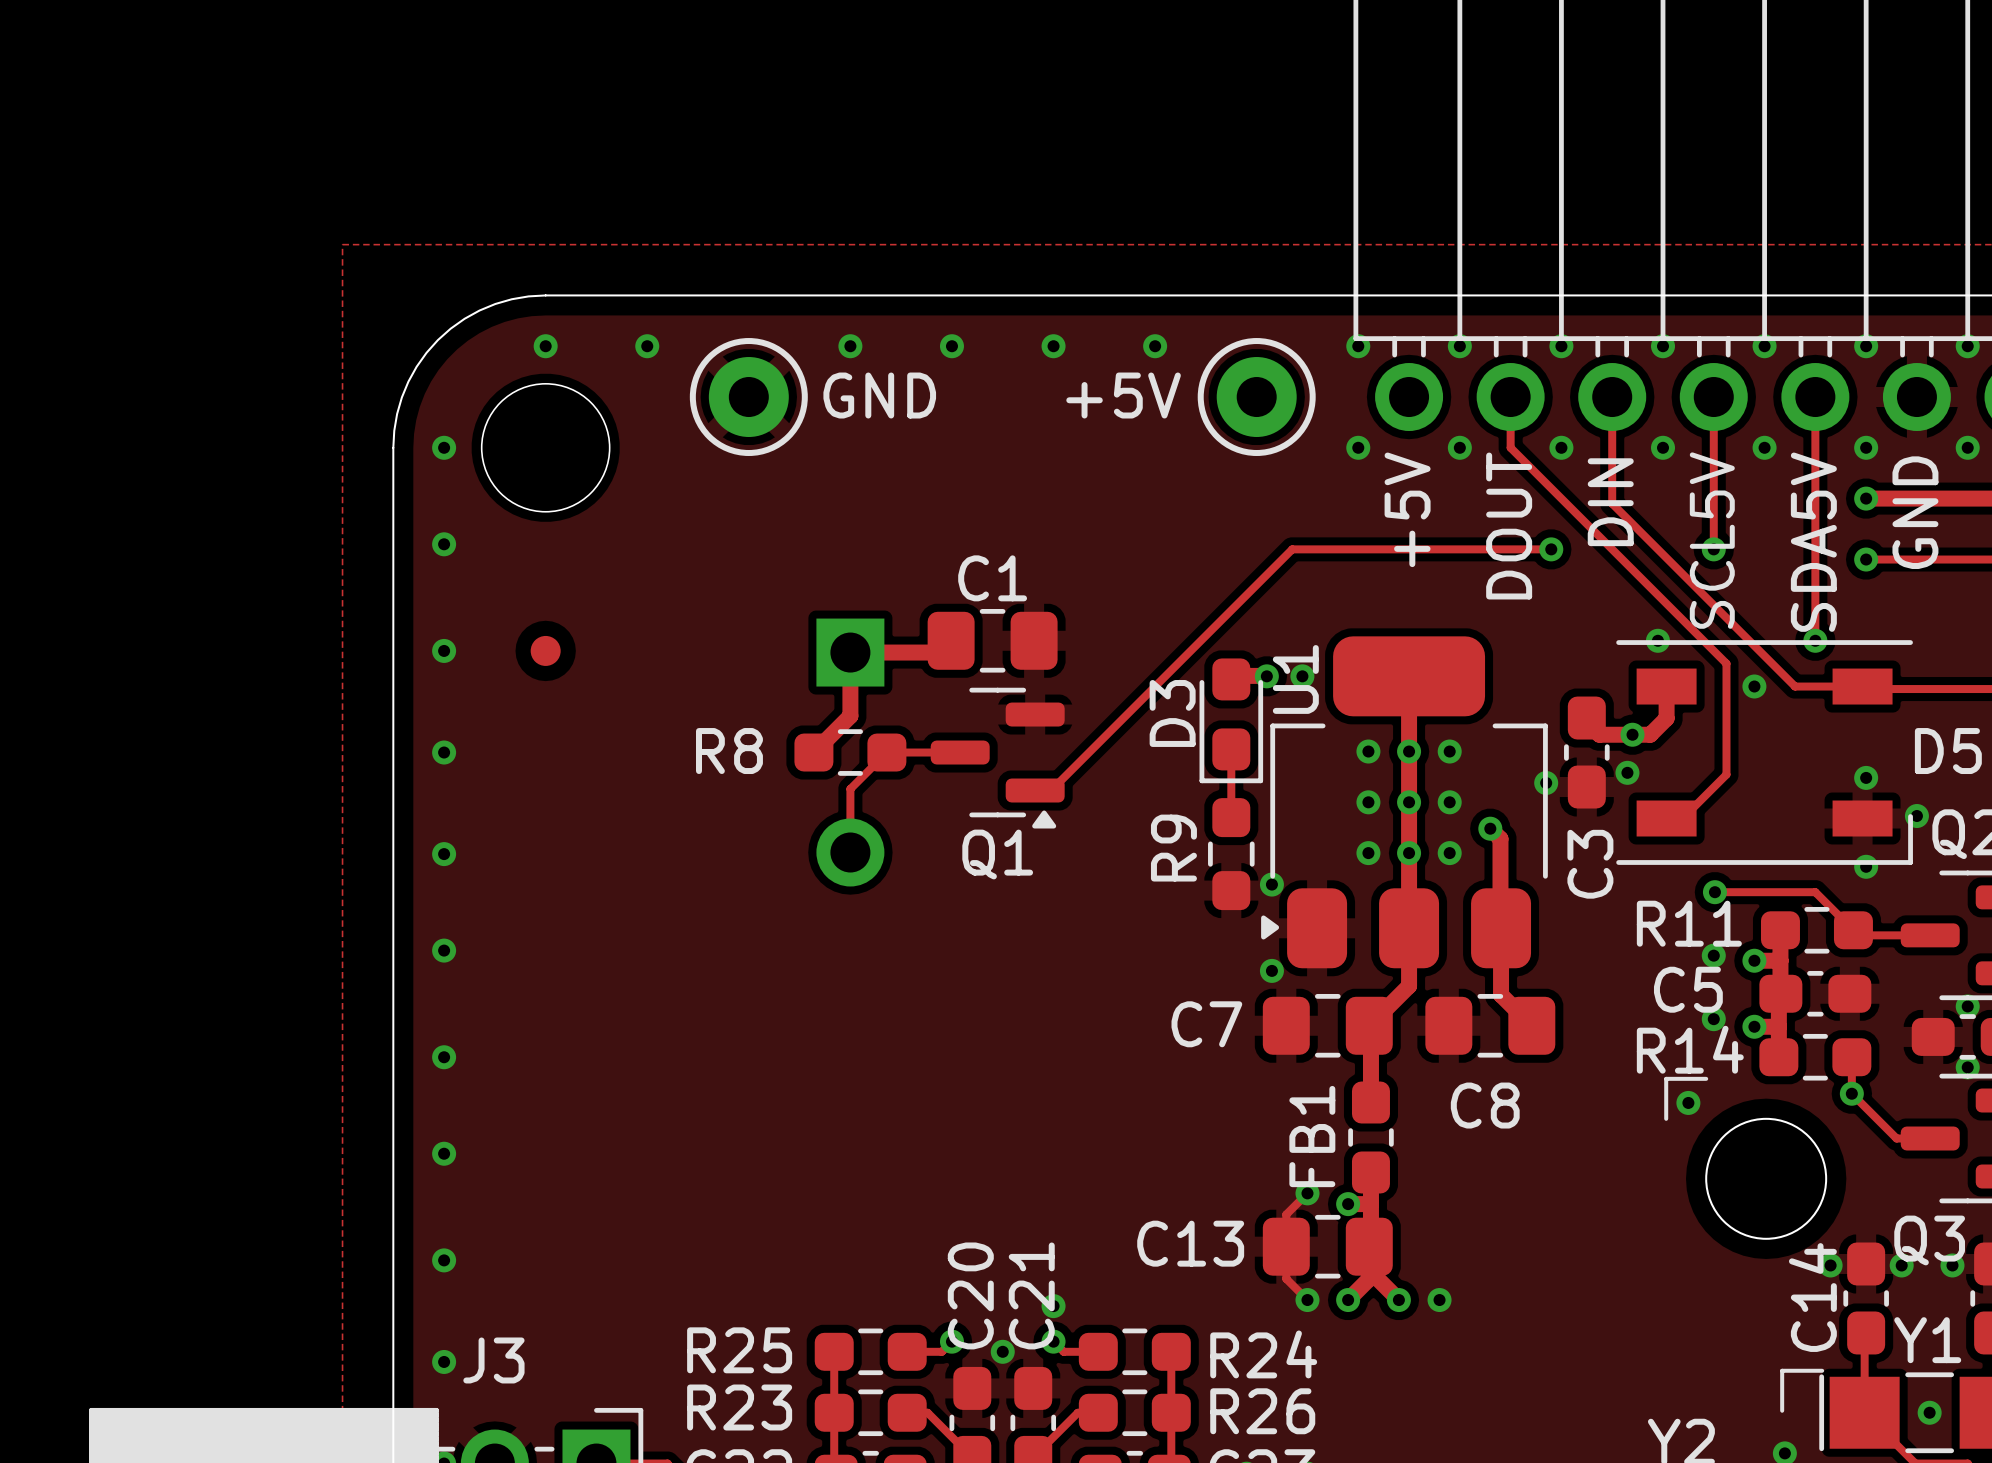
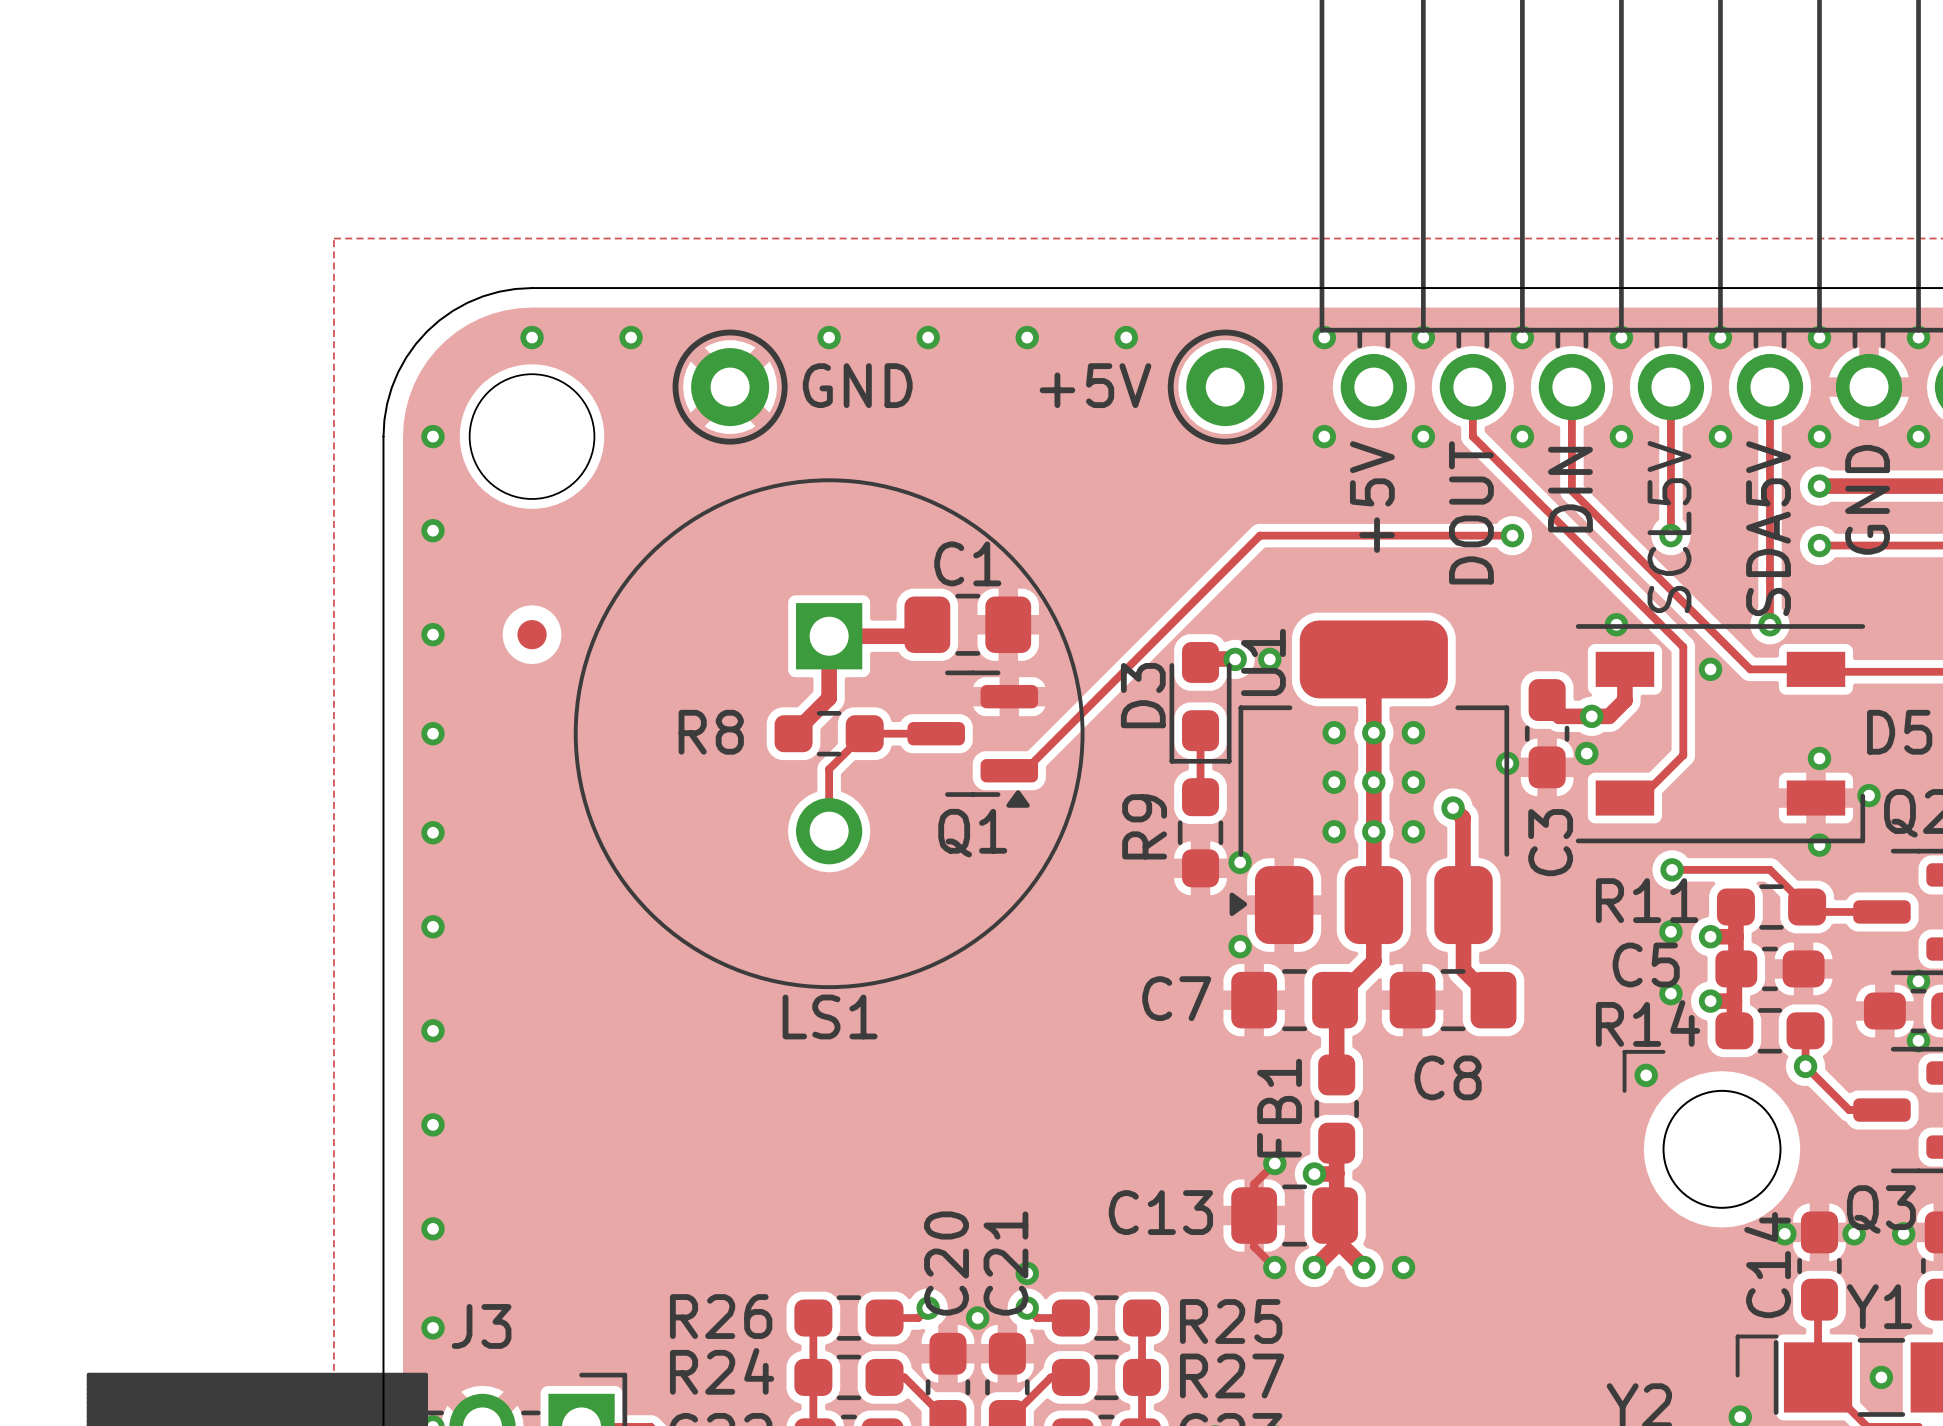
drawing: none -> [573, 478, 1085, 990]
text: none -> LS1 (830, 1016)
R25 name: R25 (739, 1350) -> R26 (721, 1316)
R24 name: R24 (1263, 1354) -> R25 (1231, 1321)
R23 name: R23 (739, 1407) -> R24 (722, 1371)
R26 name: R26 (1262, 1411) -> R27 (1232, 1375)

